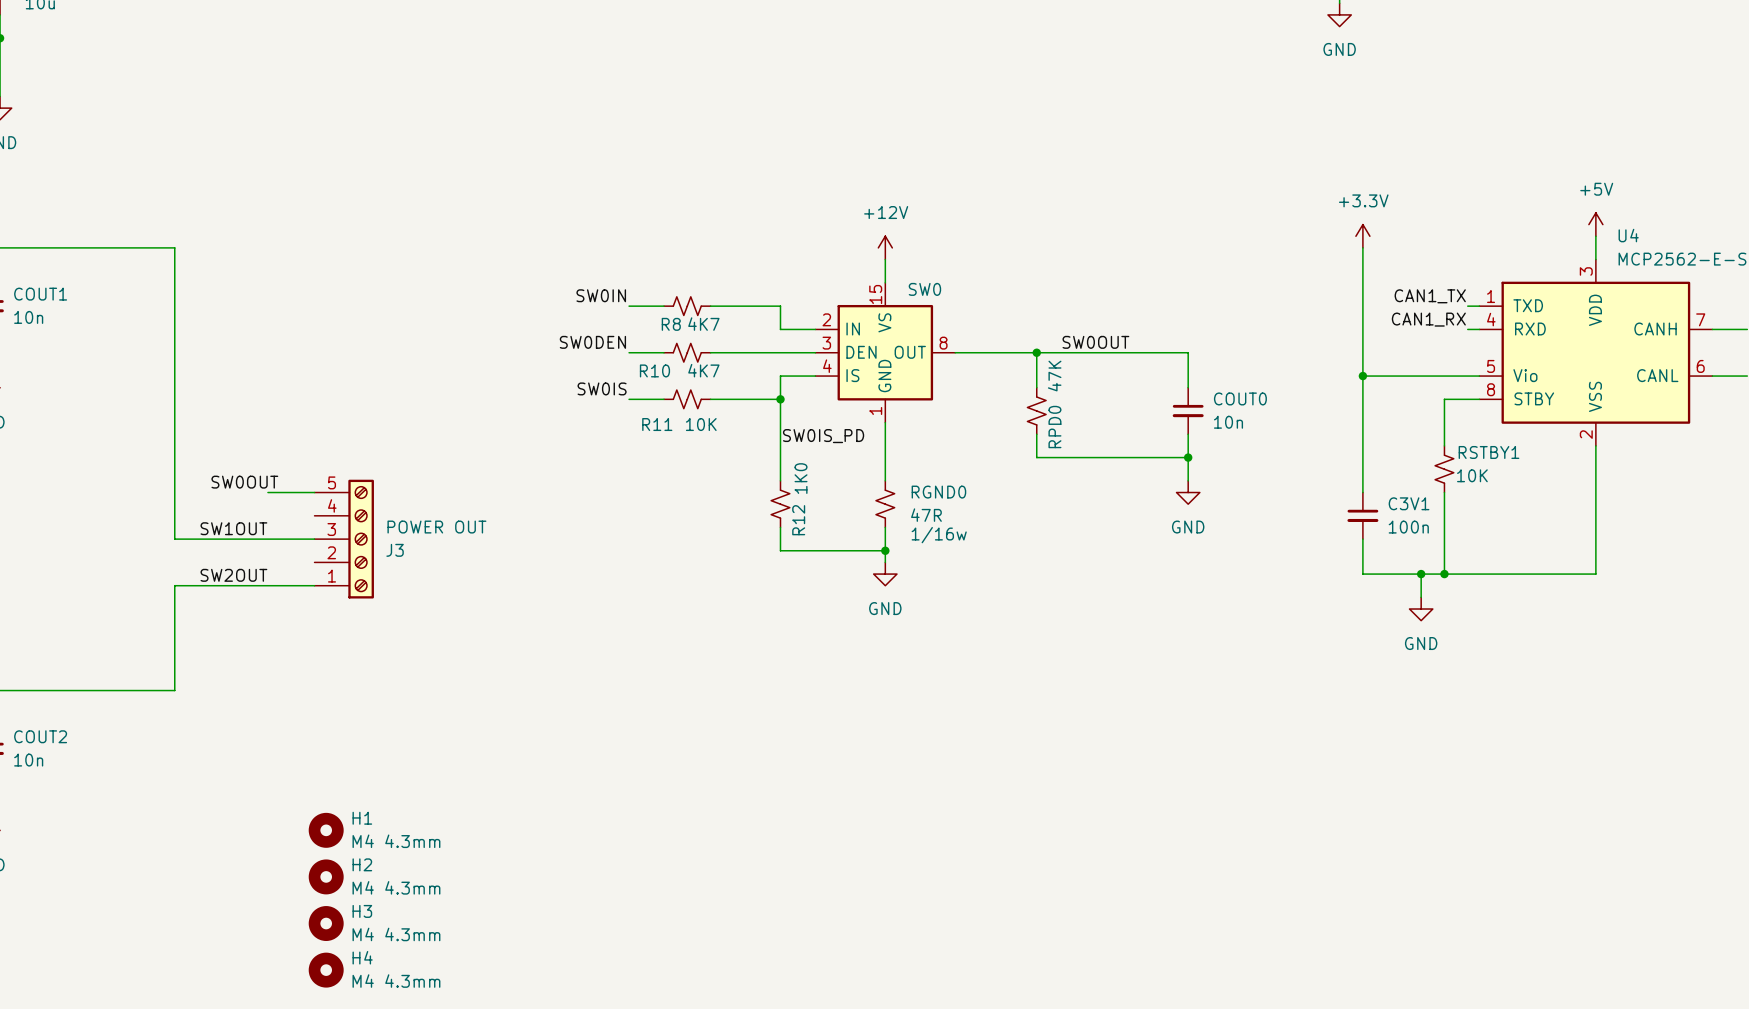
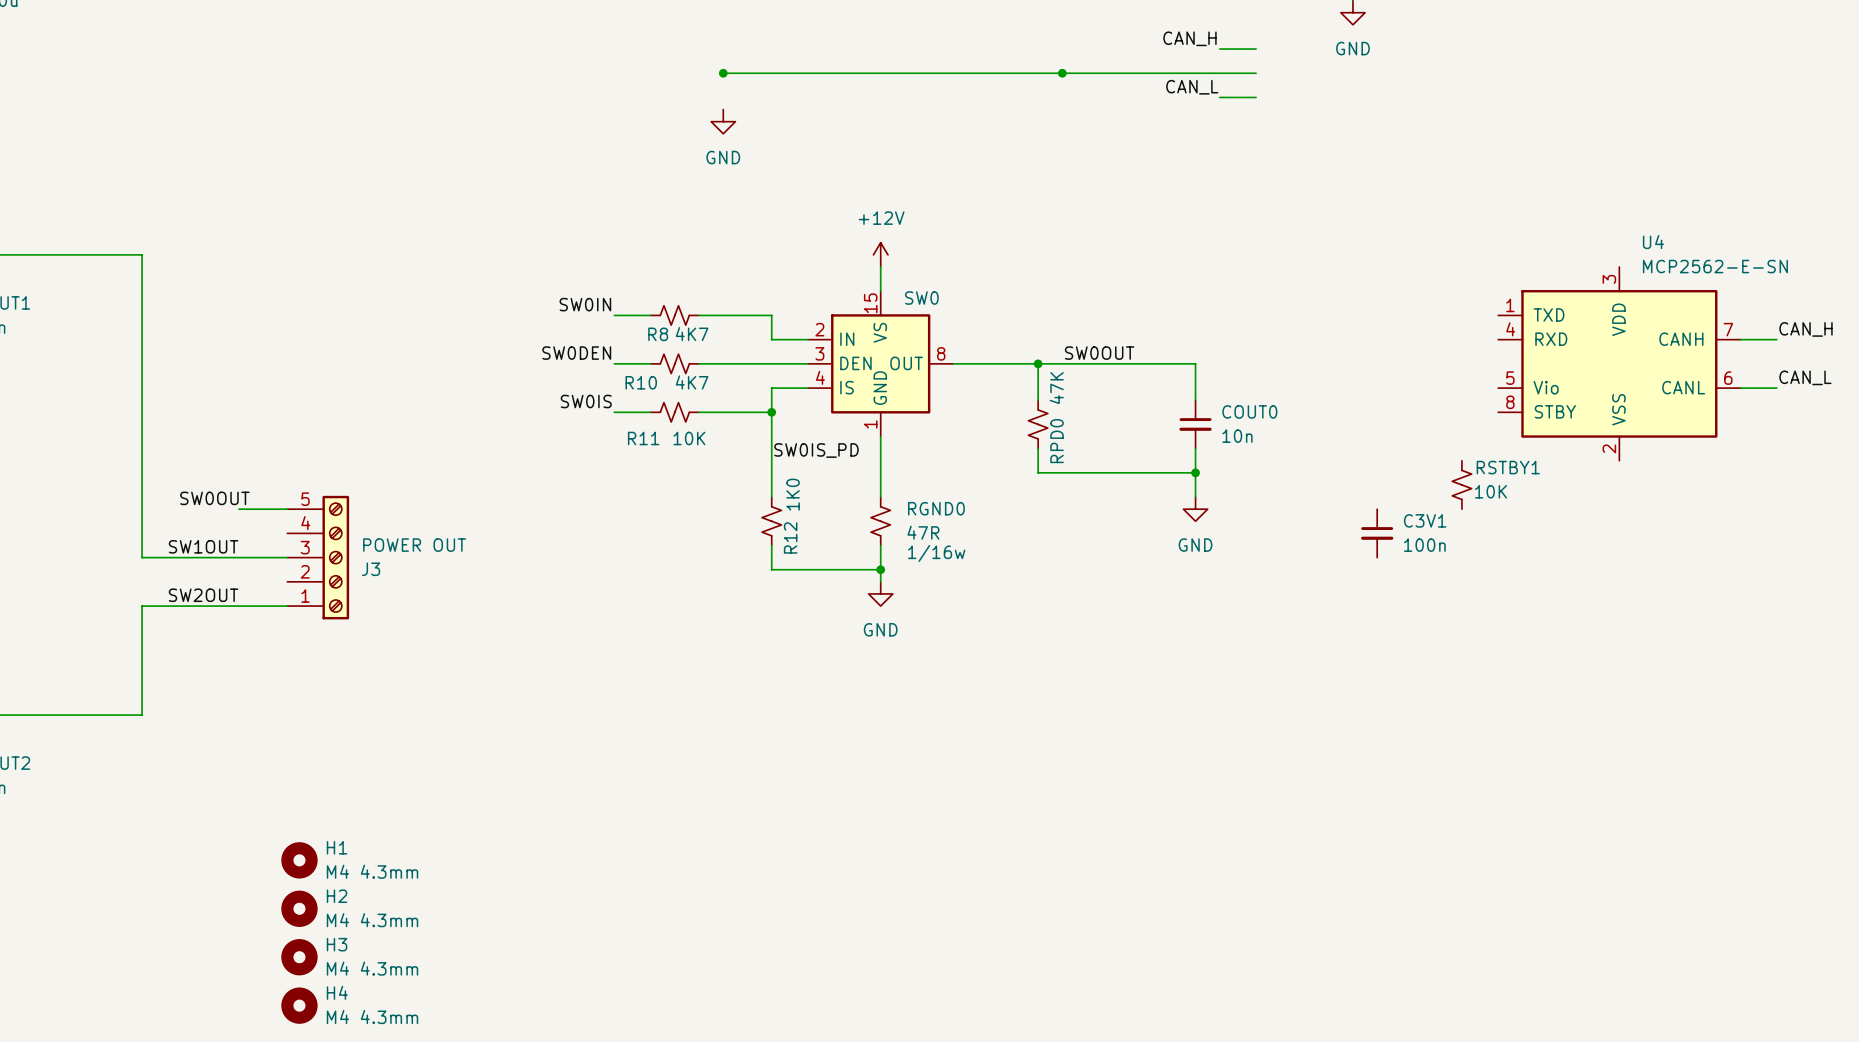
label: none -> CAN_H (1189, 38)
wire: none -> (1219, 49) (1256, 49)
wire: none -> (723, 73) (1256, 73)
junction: none -> (723, 73)
junction: none -> (1062, 73)
label: none -> CAN_L (1192, 87)
wire: none -> (1219, 97) (1256, 97)
power symbol: none -> GND (723, 121)
power symbol: +5V (1595, 224) -> none
power symbol: +3.3V (1362, 236) -> none
wire: (1595, 236) (1595, 259) -> none
wire: (1362, 247) (1362, 492) -> none
label: CAN1_TX (1430, 296) -> none
wire: (1467, 306) (1479, 306) -> none
label: CAN1_RX (1428, 319) -> none
wire: (1467, 329) (1479, 329) -> none
wire: (1362, 376) (1479, 376) -> none
junction: (1362, 376) -> none
wire: (1479, 399) (1444, 399) (1444, 445) -> none
wire: (1595, 445) (1595, 574) (1362, 574) (1362, 539) -> none
wire: (1444, 492) (1444, 574) -> none
wire: (1421, 574) (1421, 597) -> none
junction: (1421, 574) -> none
junction: (1444, 574) -> none
power symbol: GND (1421, 609) -> none

